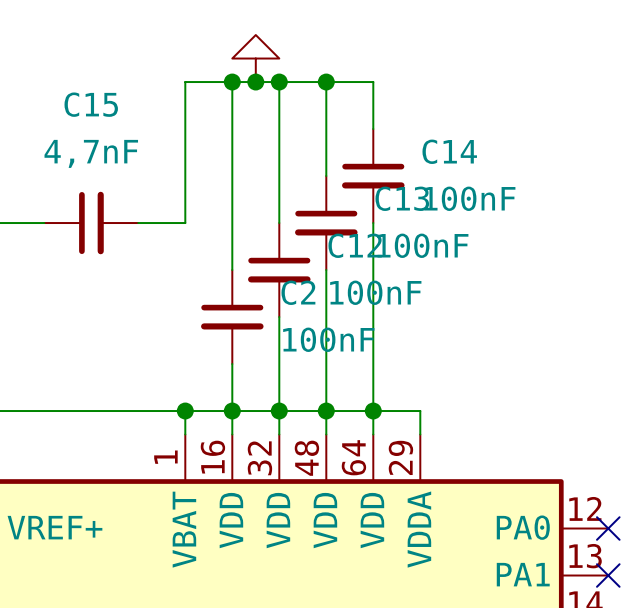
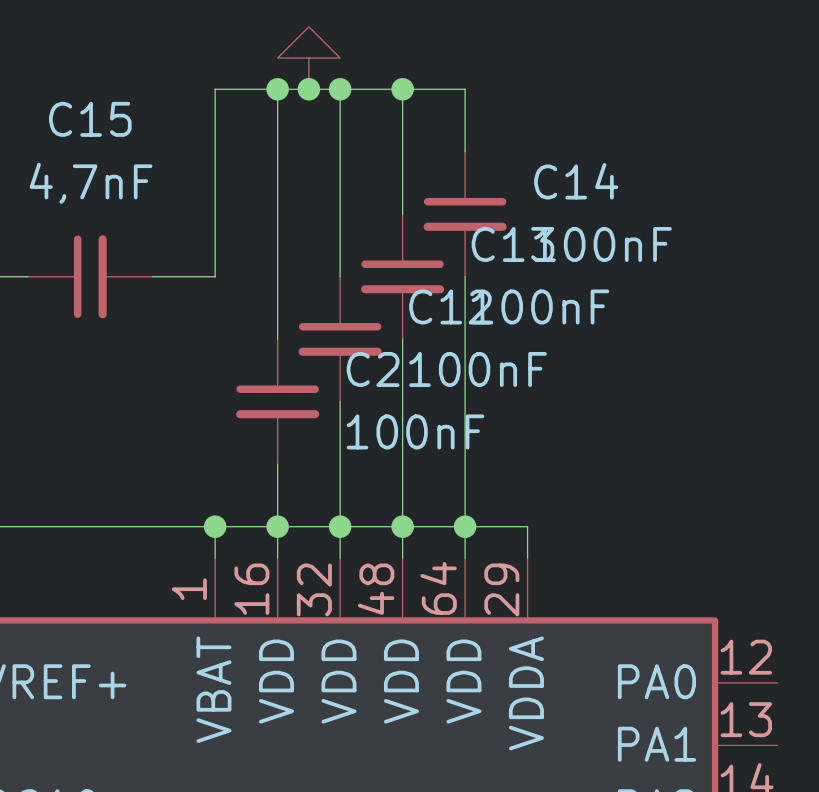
no-connect mark: (608, 528) -> none
no-connect mark: (608, 575) -> none

